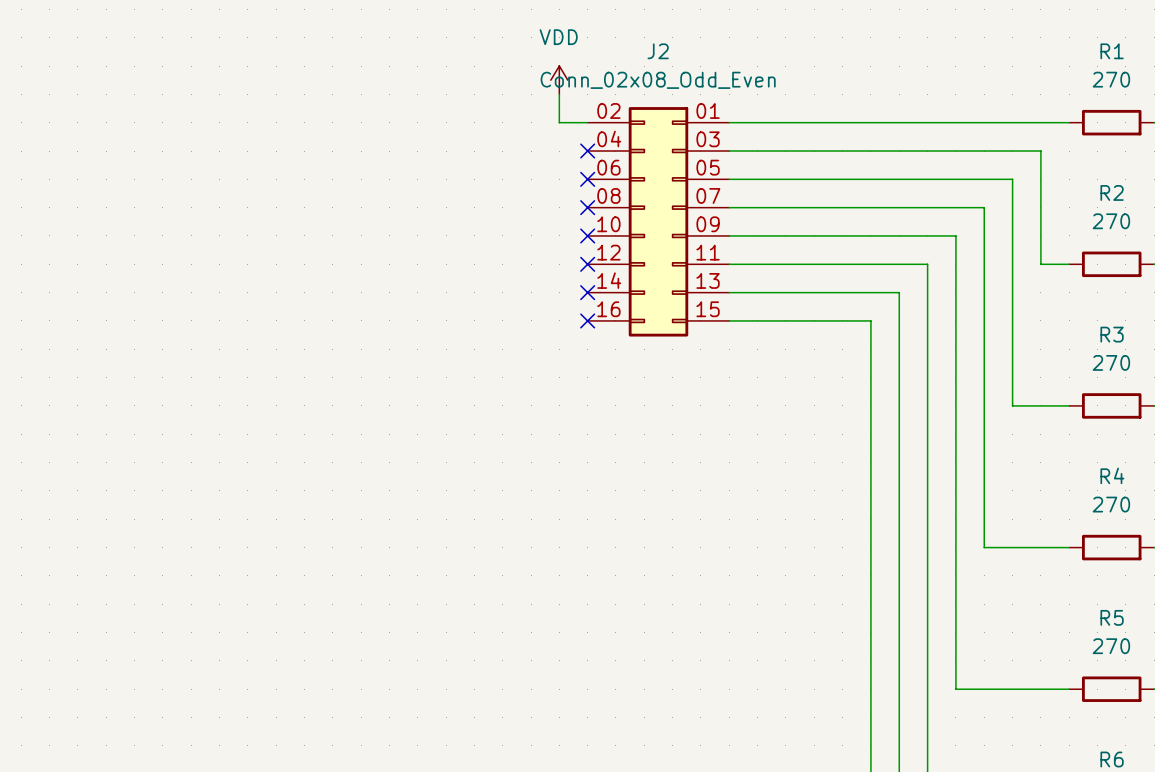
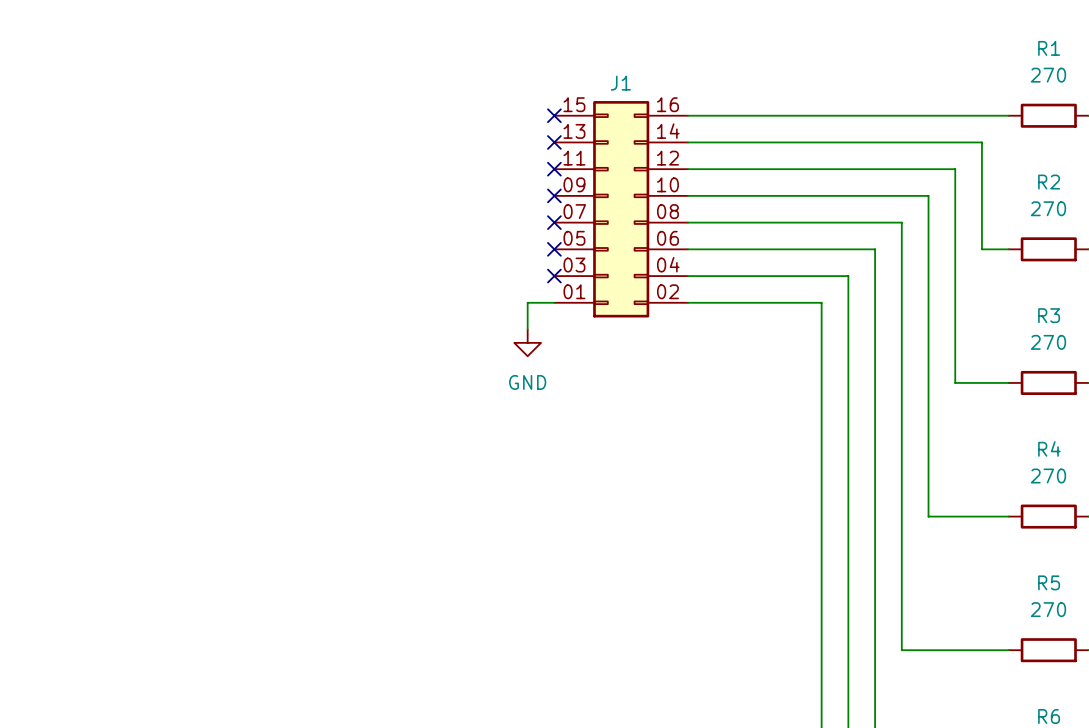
J2 name: J2 (658, 51) -> J1 (620, 83)
power symbol: VDD (559, 80) -> none
J2 value: Conn_02x08_Odd_Even (658, 80) -> none
wire: (559, 94) (559, 122) (587, 122) -> none
no-connect mark: none -> (554, 115)
J2 rotation: 0° (658, 221) -> 180° (621, 209)
wire: none -> (554, 302) (527, 302) (527, 329)
no-connect mark: (587, 320) -> none
power symbol: none -> GND (527, 342)

